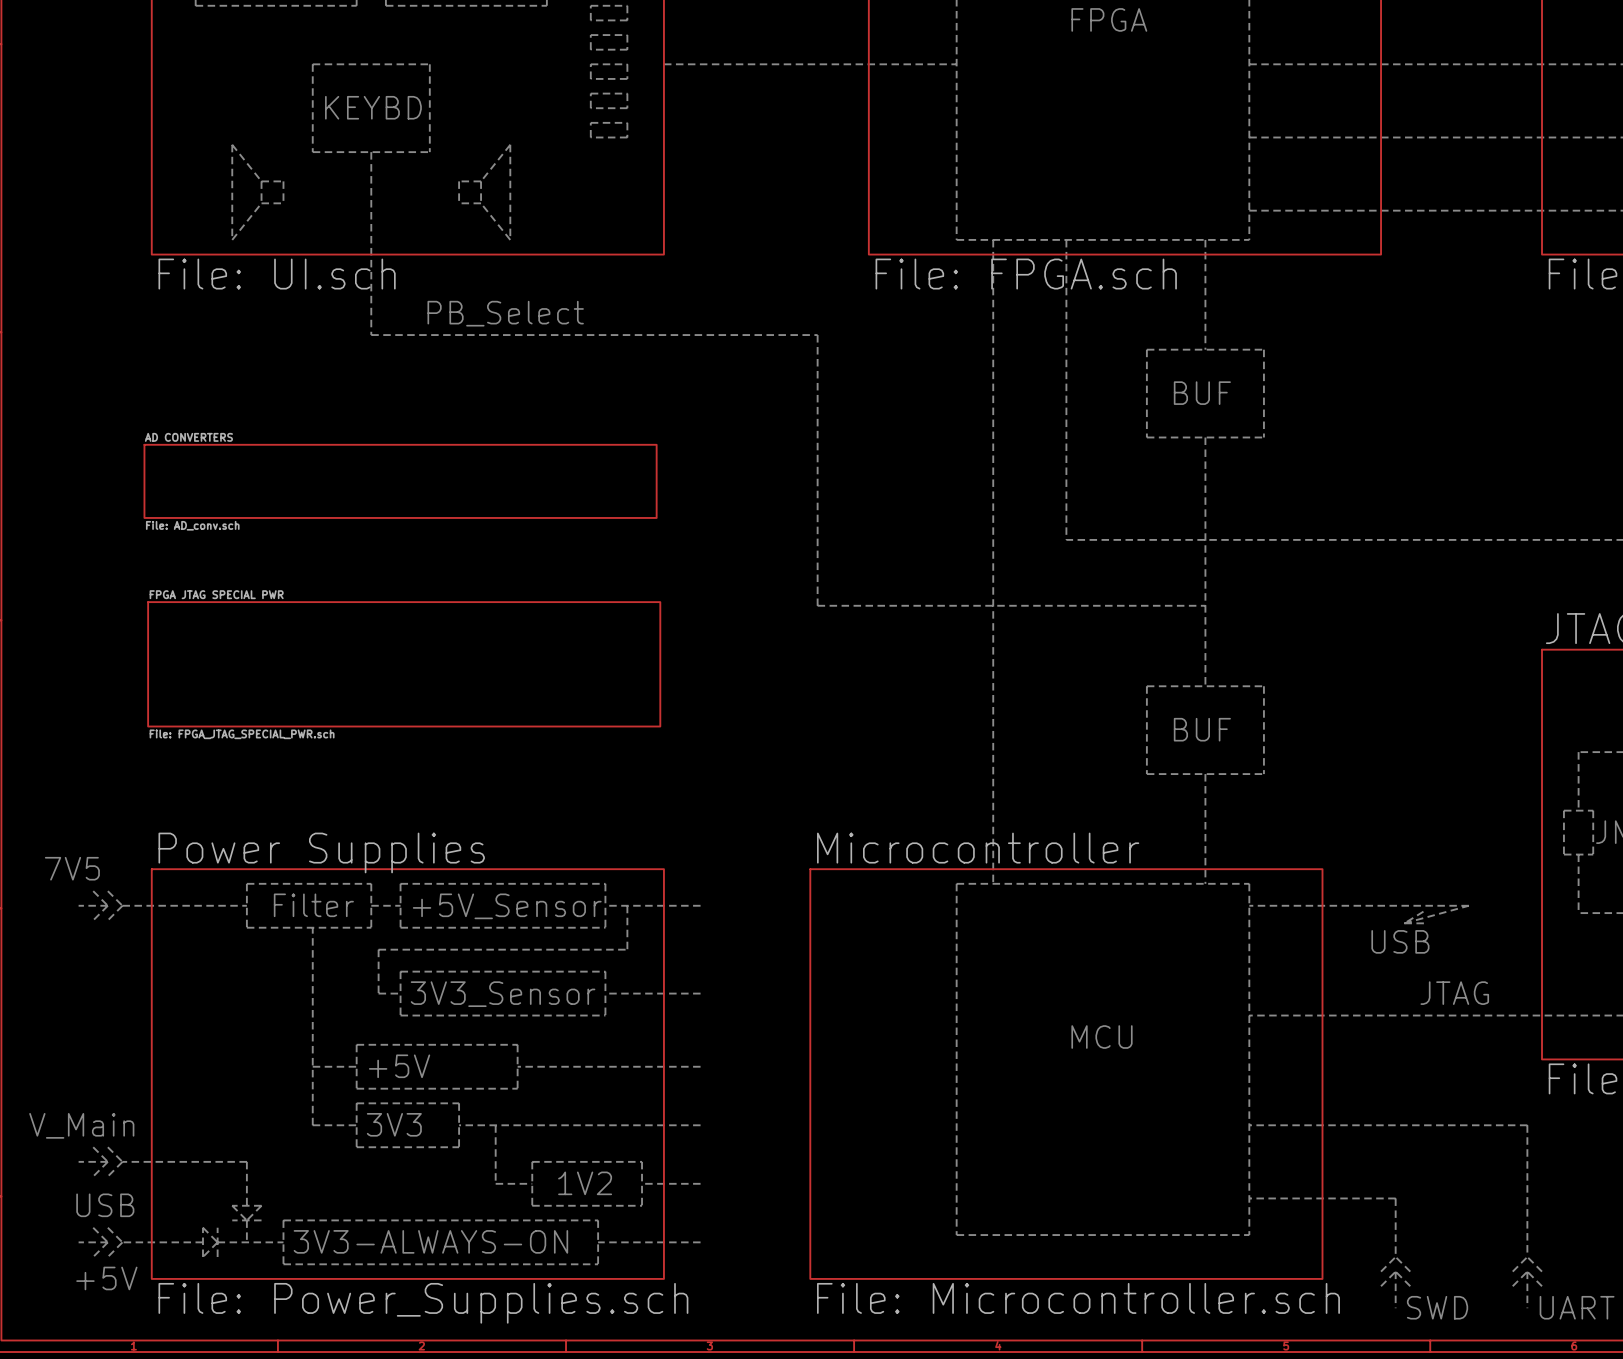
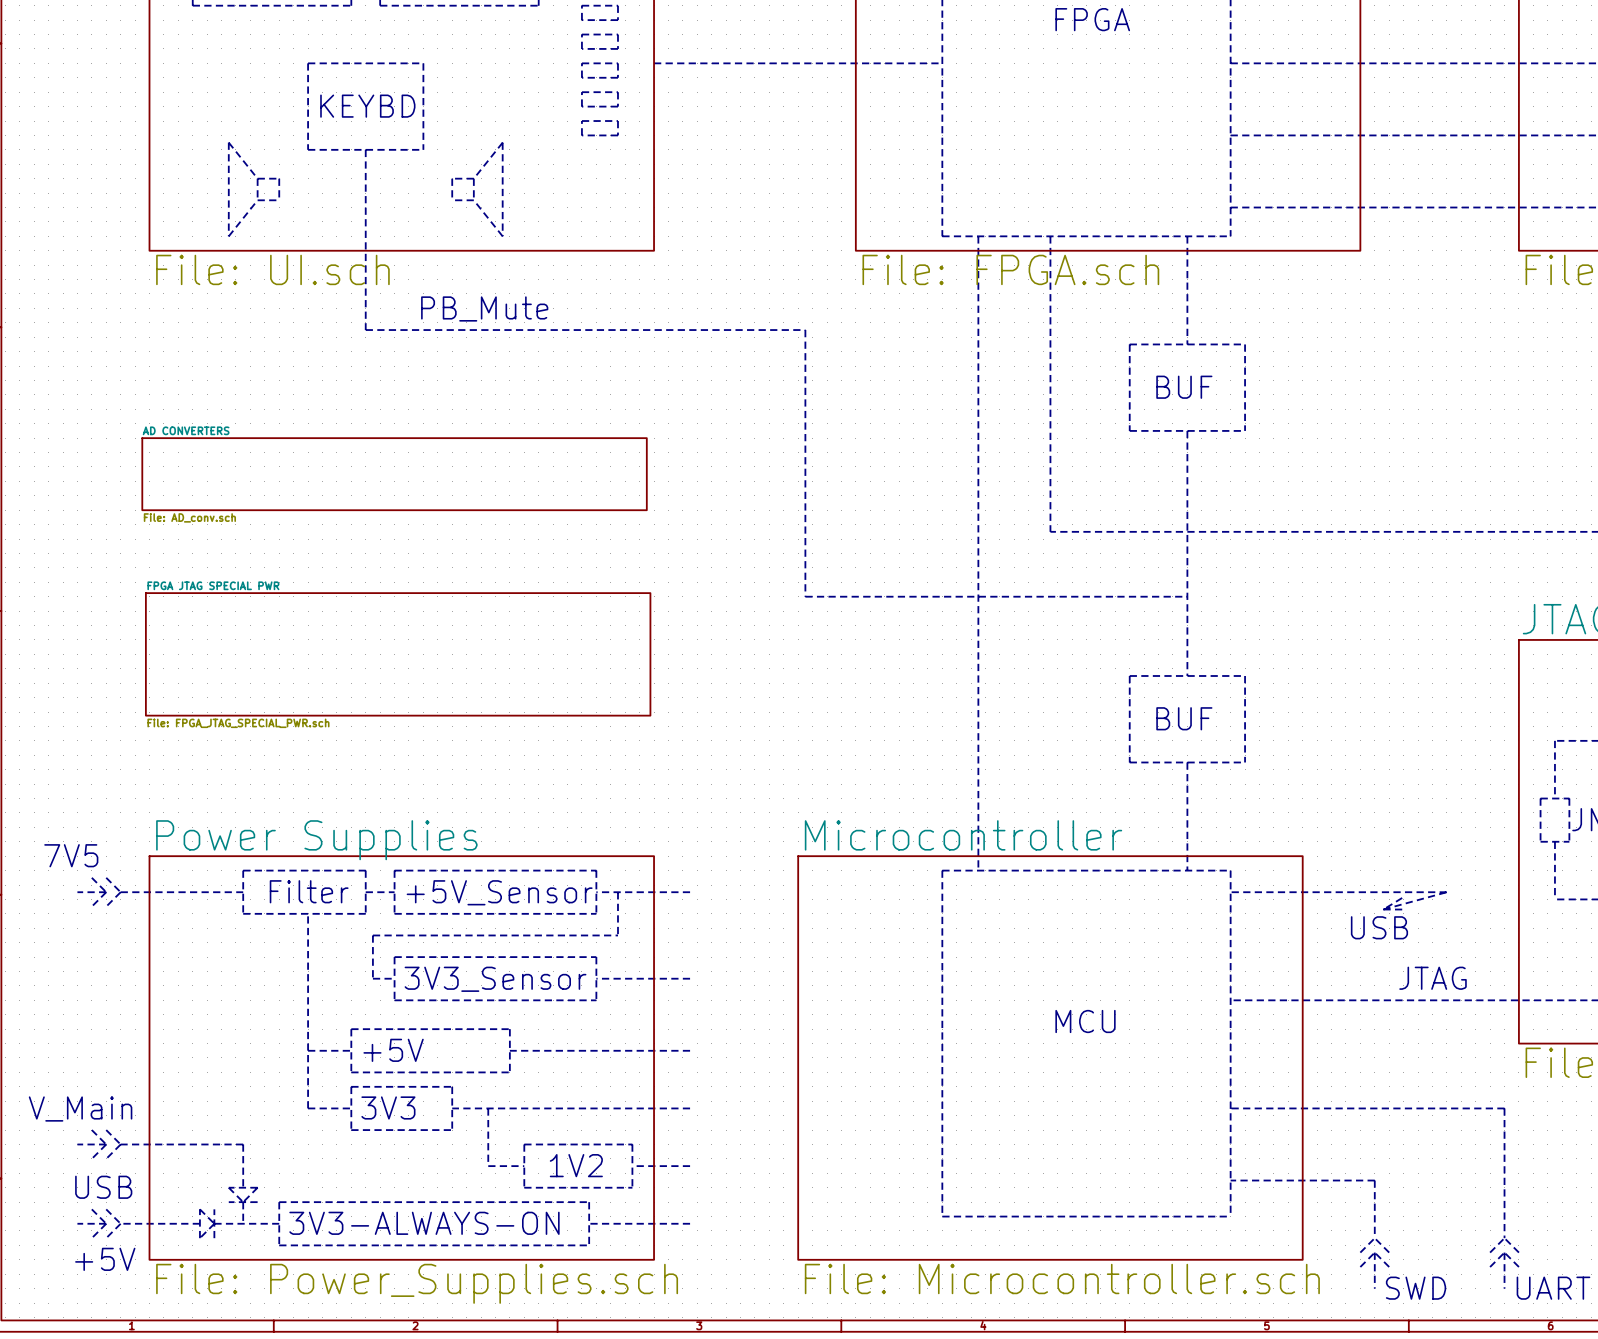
text: PB_Select (505, 313) -> PB_Mute (484, 308)

